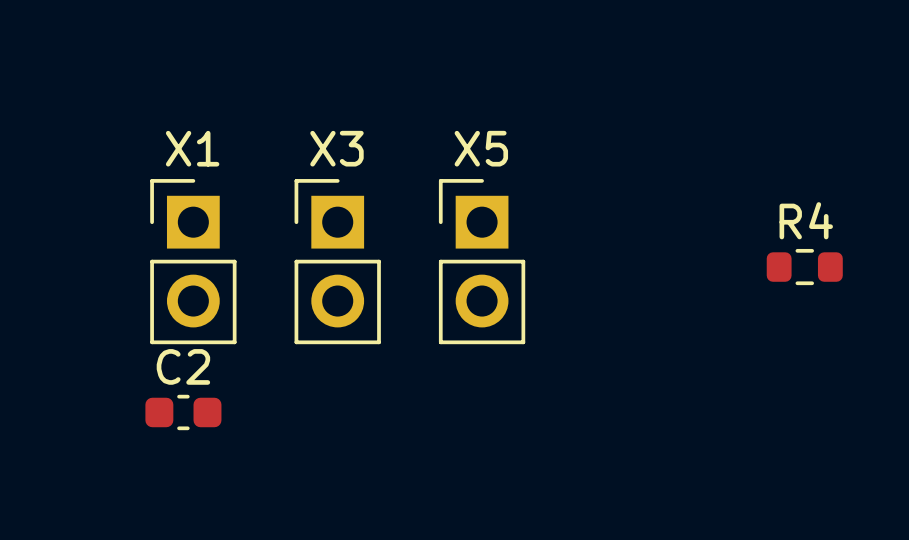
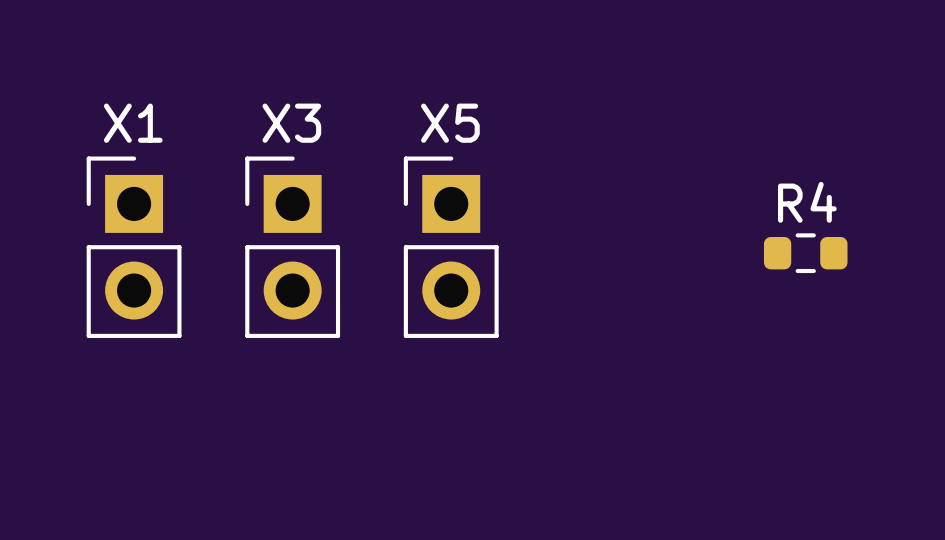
C2: (183, 412) -> none

